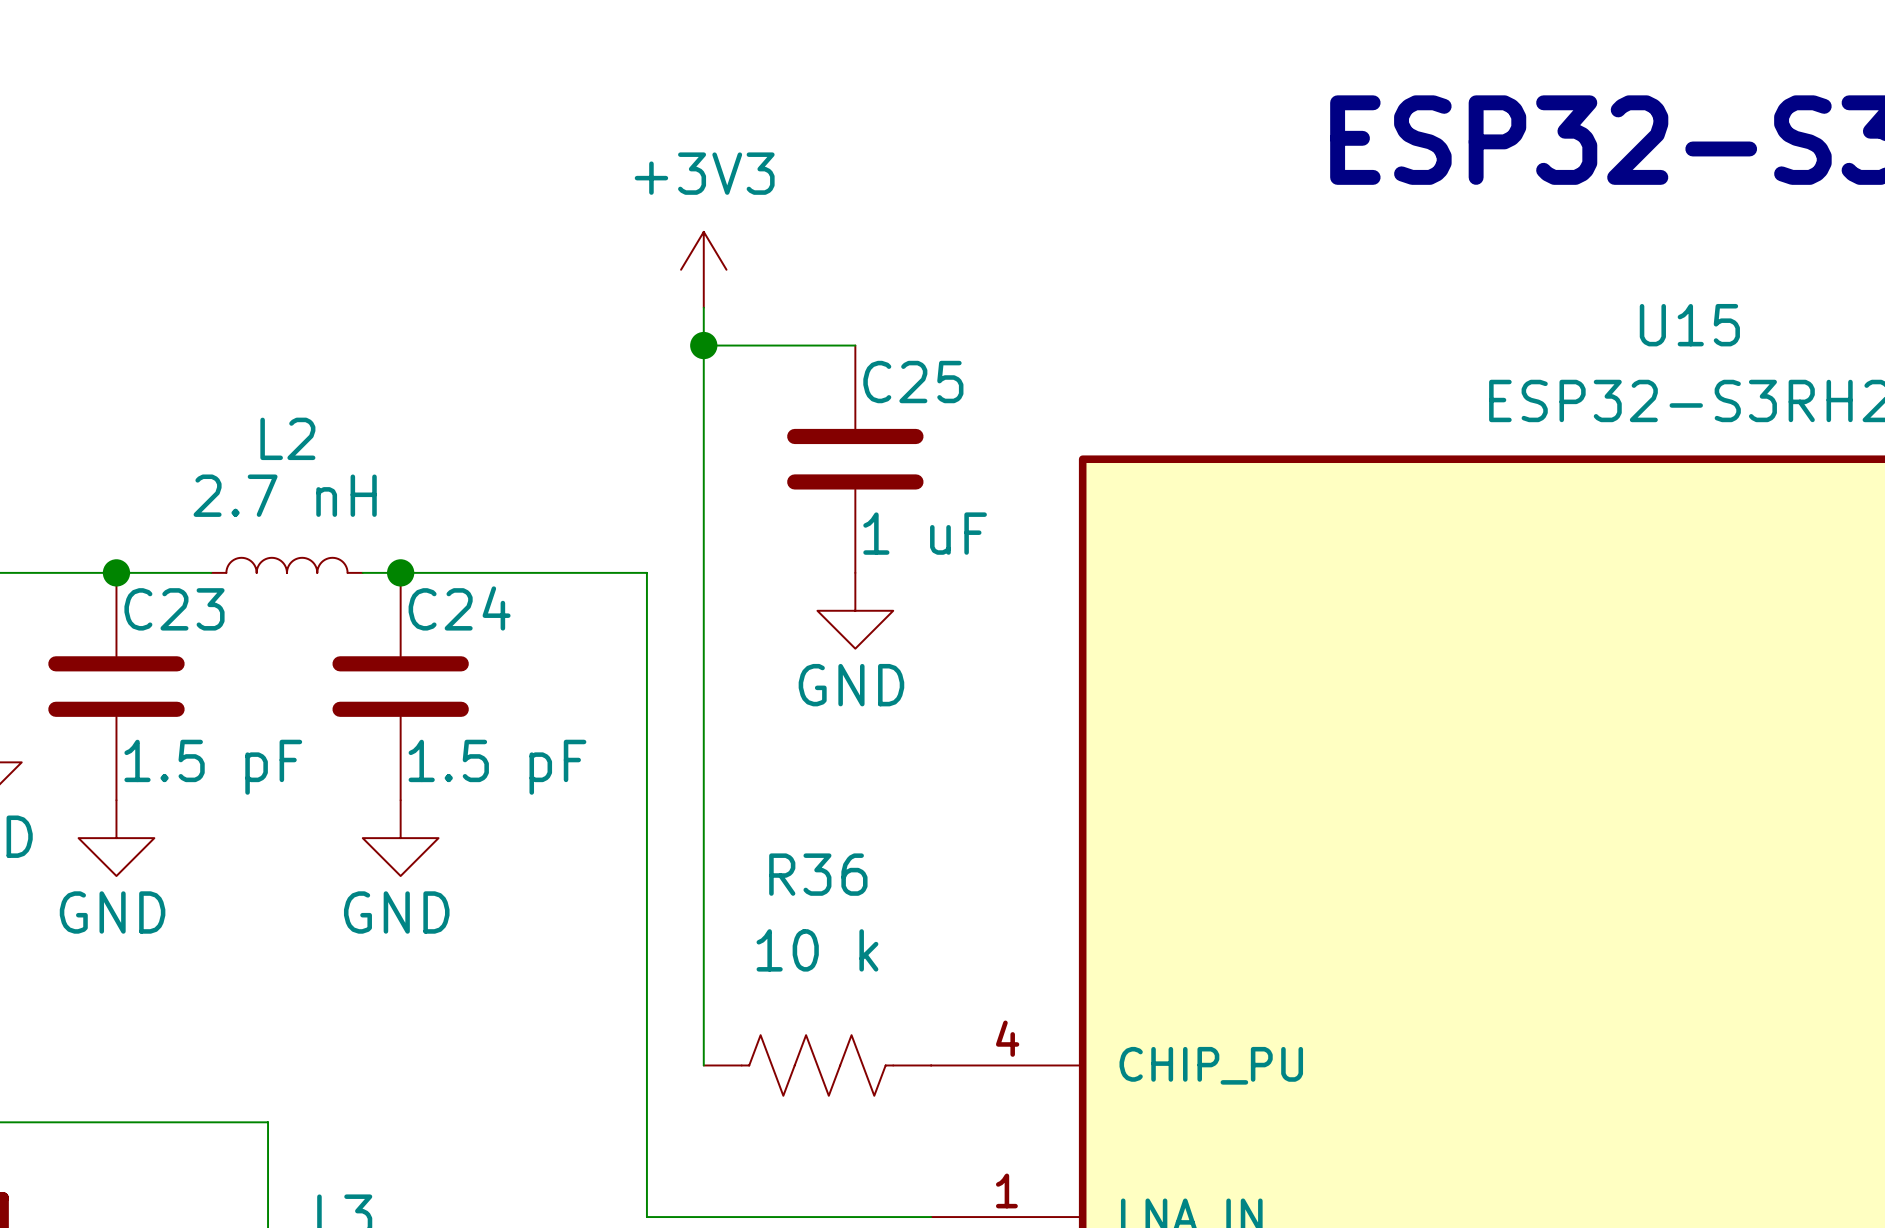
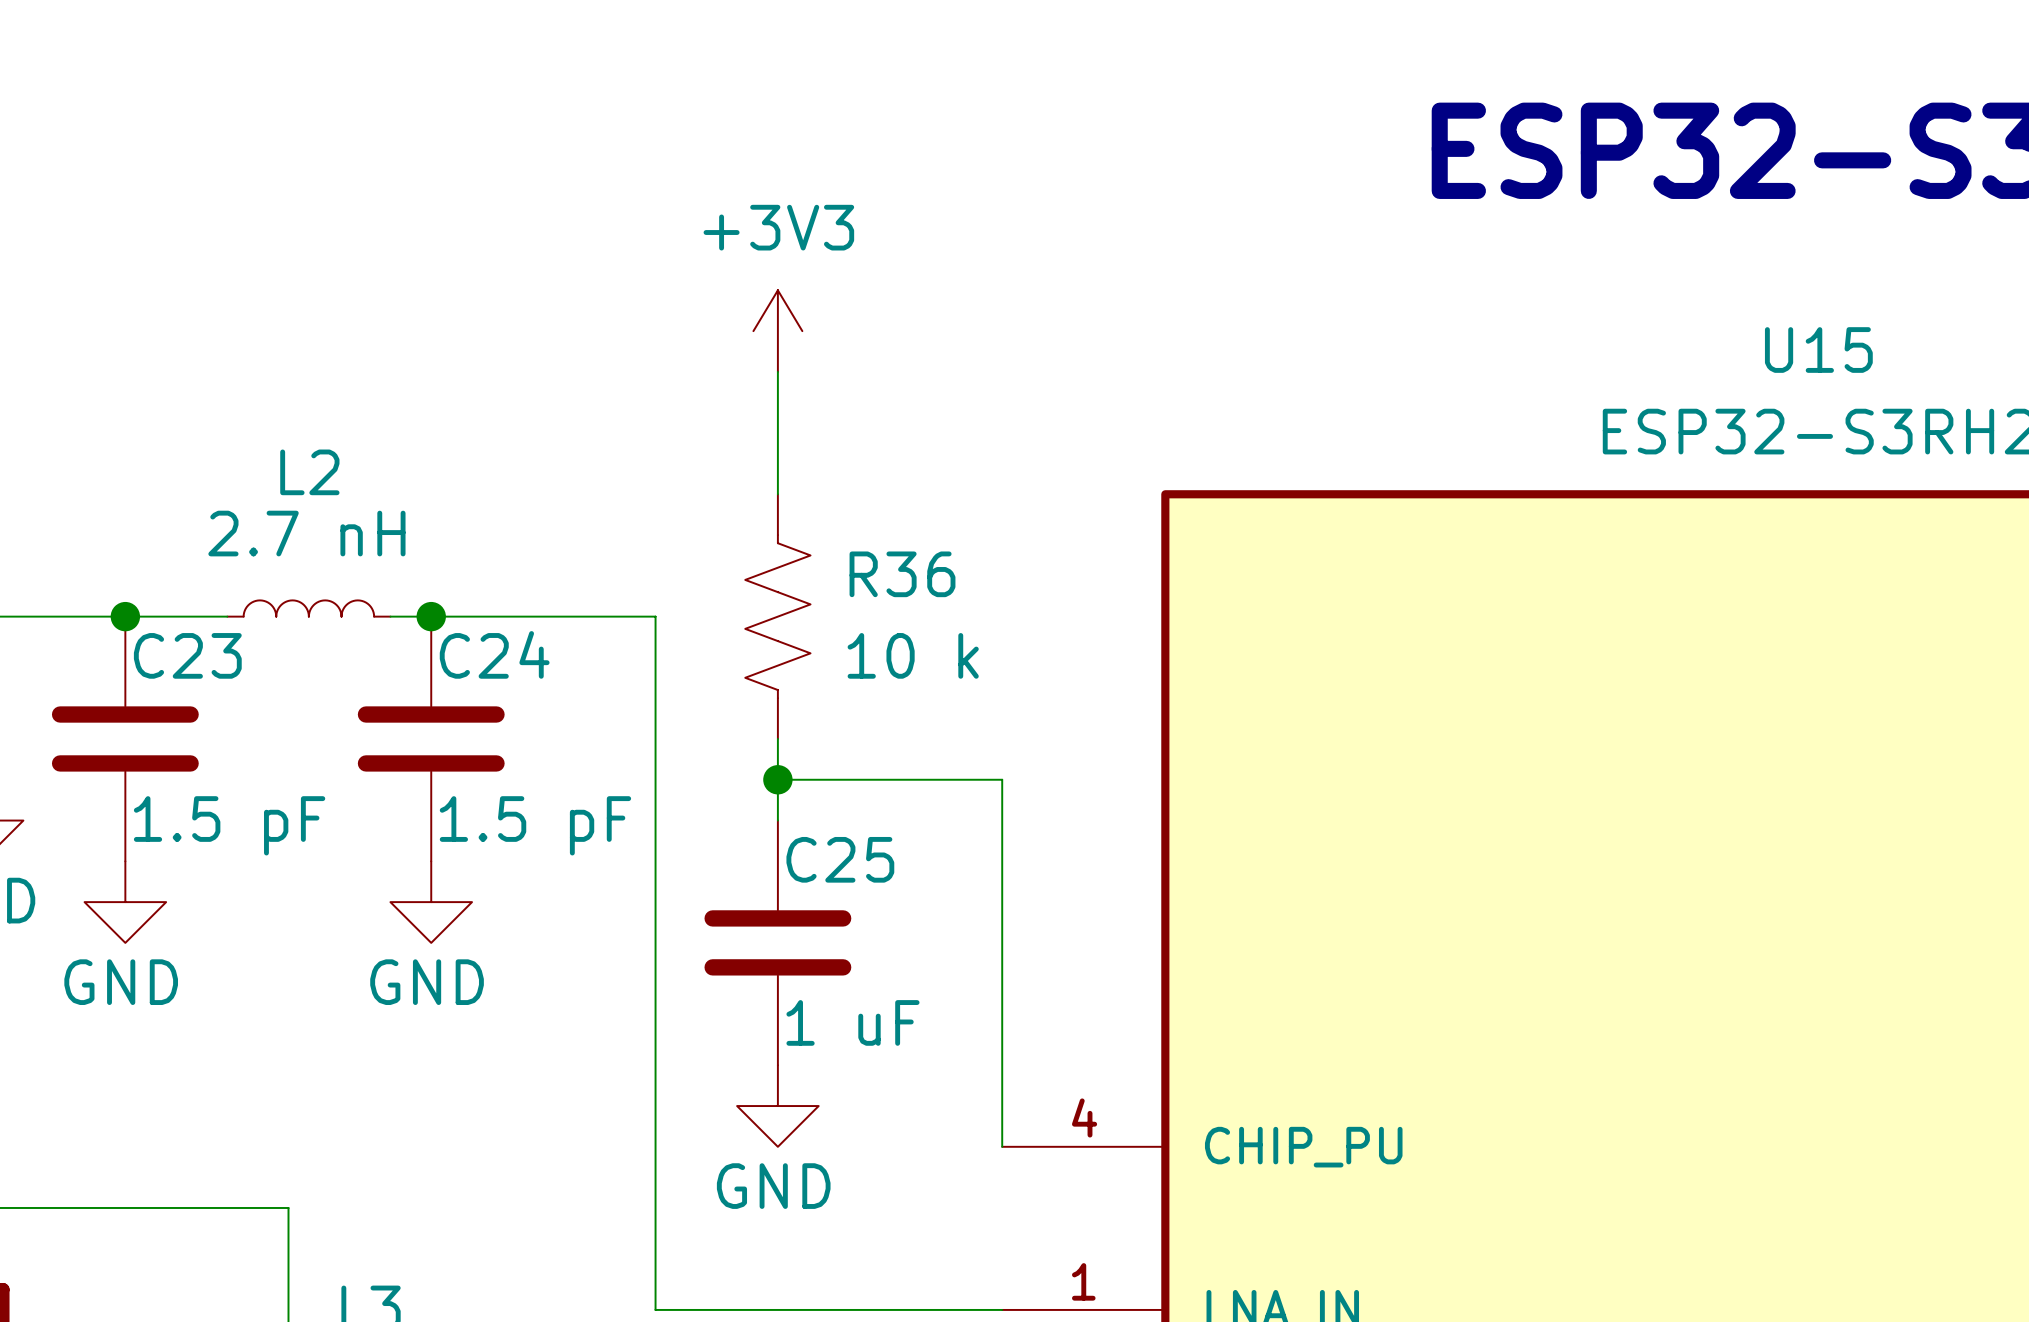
power symbol position: +3V3 (703, 269) -> +3V3 (777, 331)
wire: (703, 307) (703, 1065) -> none
wire: (703, 345) (855, 345) -> none
junction: (703, 345) -> none
wire: none -> (777, 371) (777, 494)
C25 position: (855, 459) -> (777, 942)
wire: (609, 572) (646, 572) (646, 1217) -> (655, 616) (655, 1309) (696, 1309)
power symbol position: GND (855, 610) -> GND (777, 1106)
wire: none -> (777, 738) (777, 820)
wire: none -> (777, 779) (1002, 779) (1002, 1146)
junction: none -> (777, 779)
R36 name position: R36 (818, 874) -> R36 (902, 574)
R36 rotation: 0° (817, 1065) -> 90° clockwise (777, 616)
R36 position: (817, 1065) -> (777, 616)

